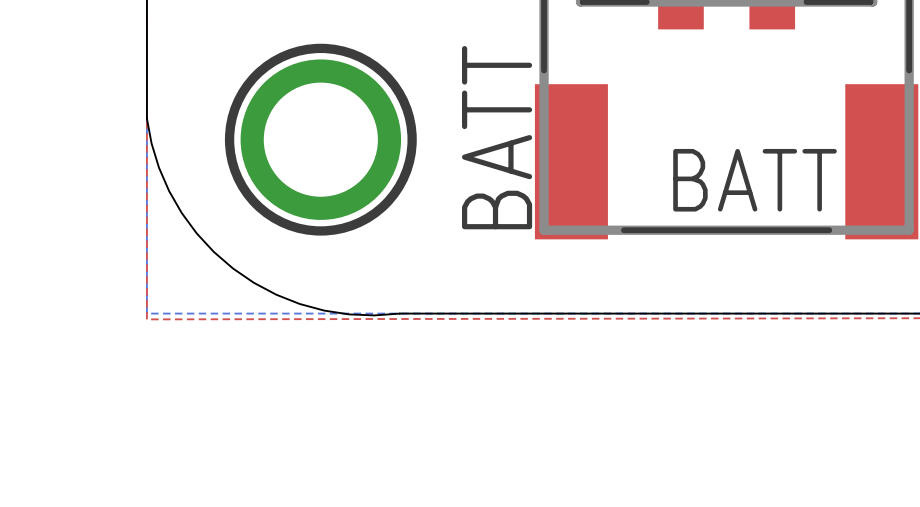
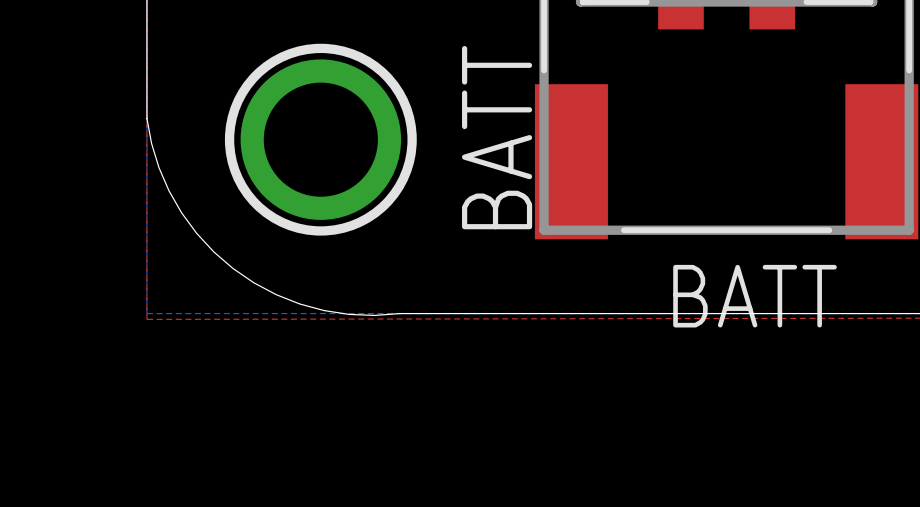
BATT name position: BATT (755, 180) -> BATT (755, 296)

